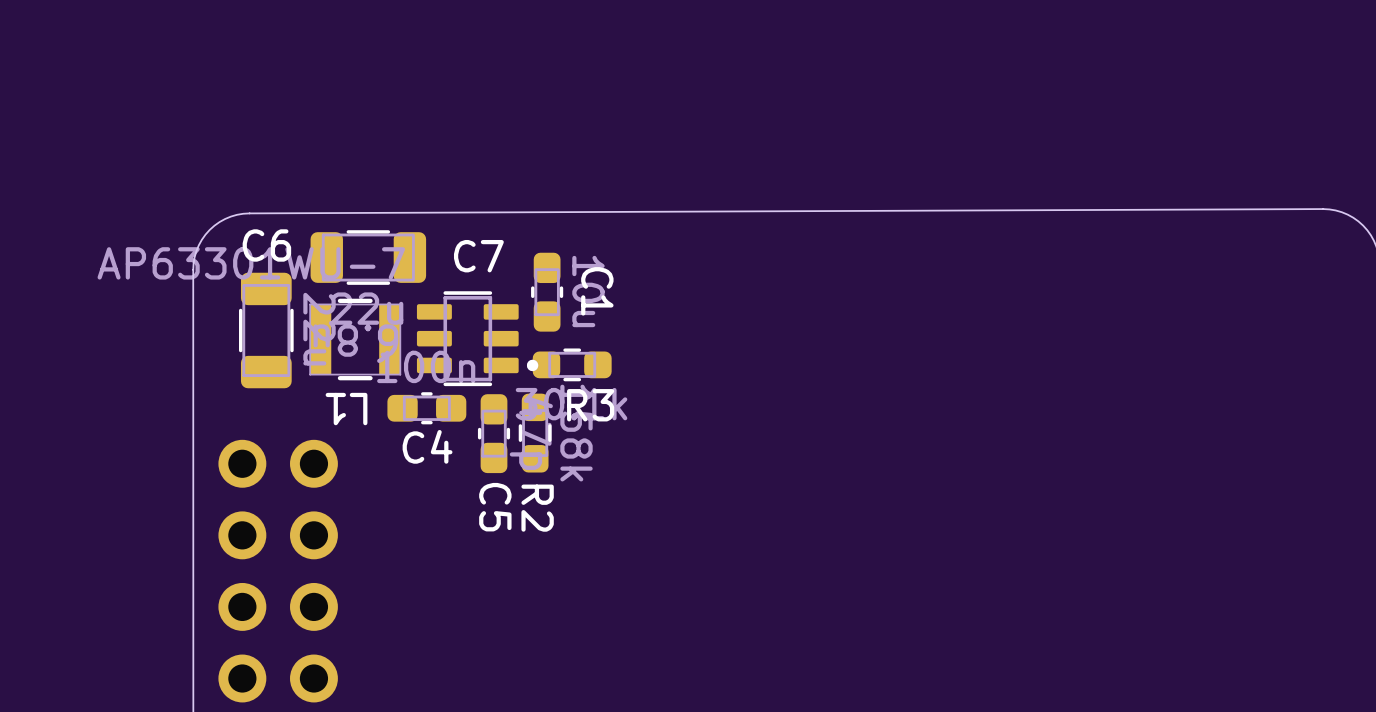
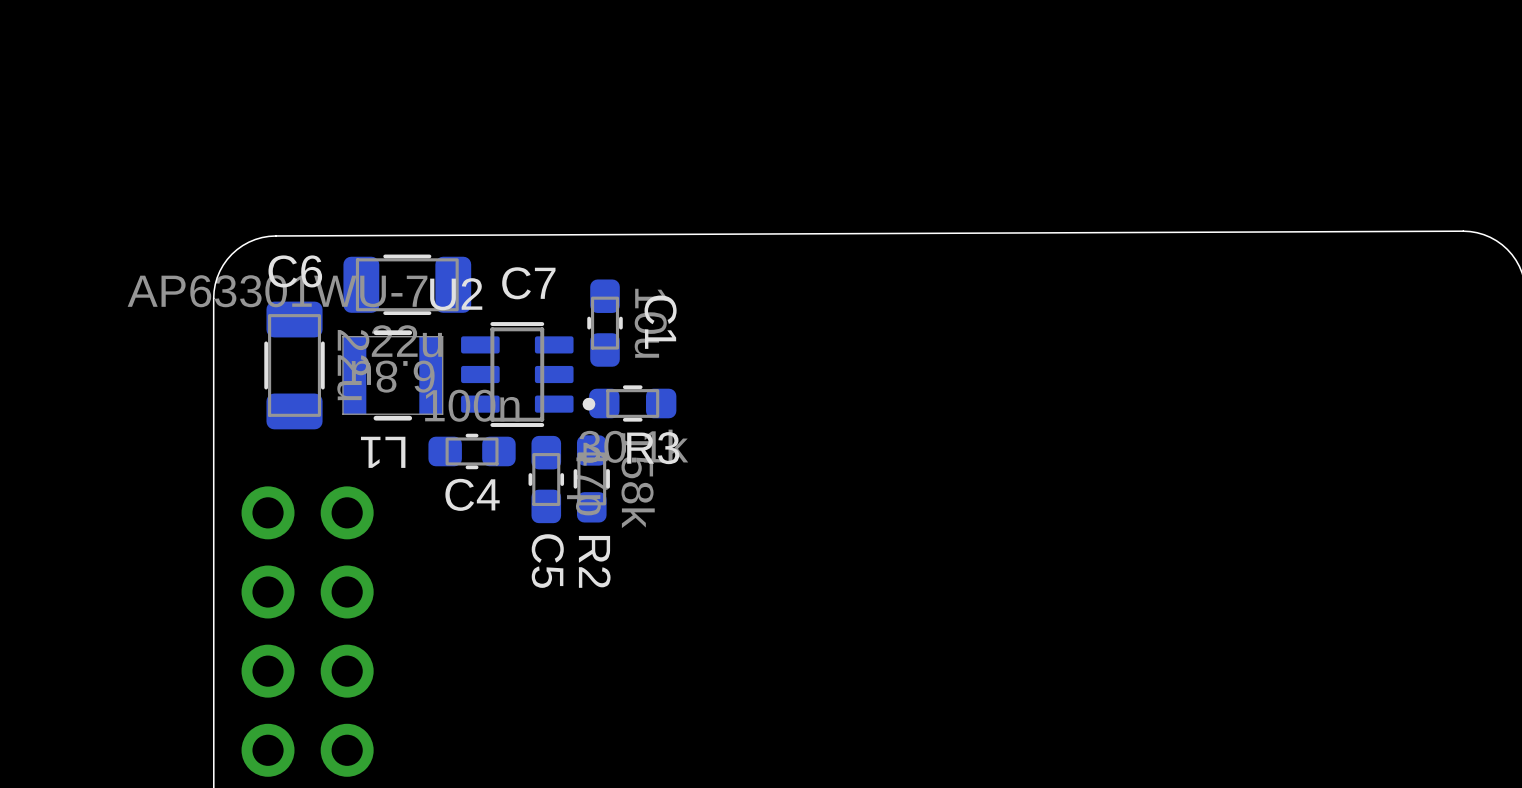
U2 name: none -> U2 (456, 294)

